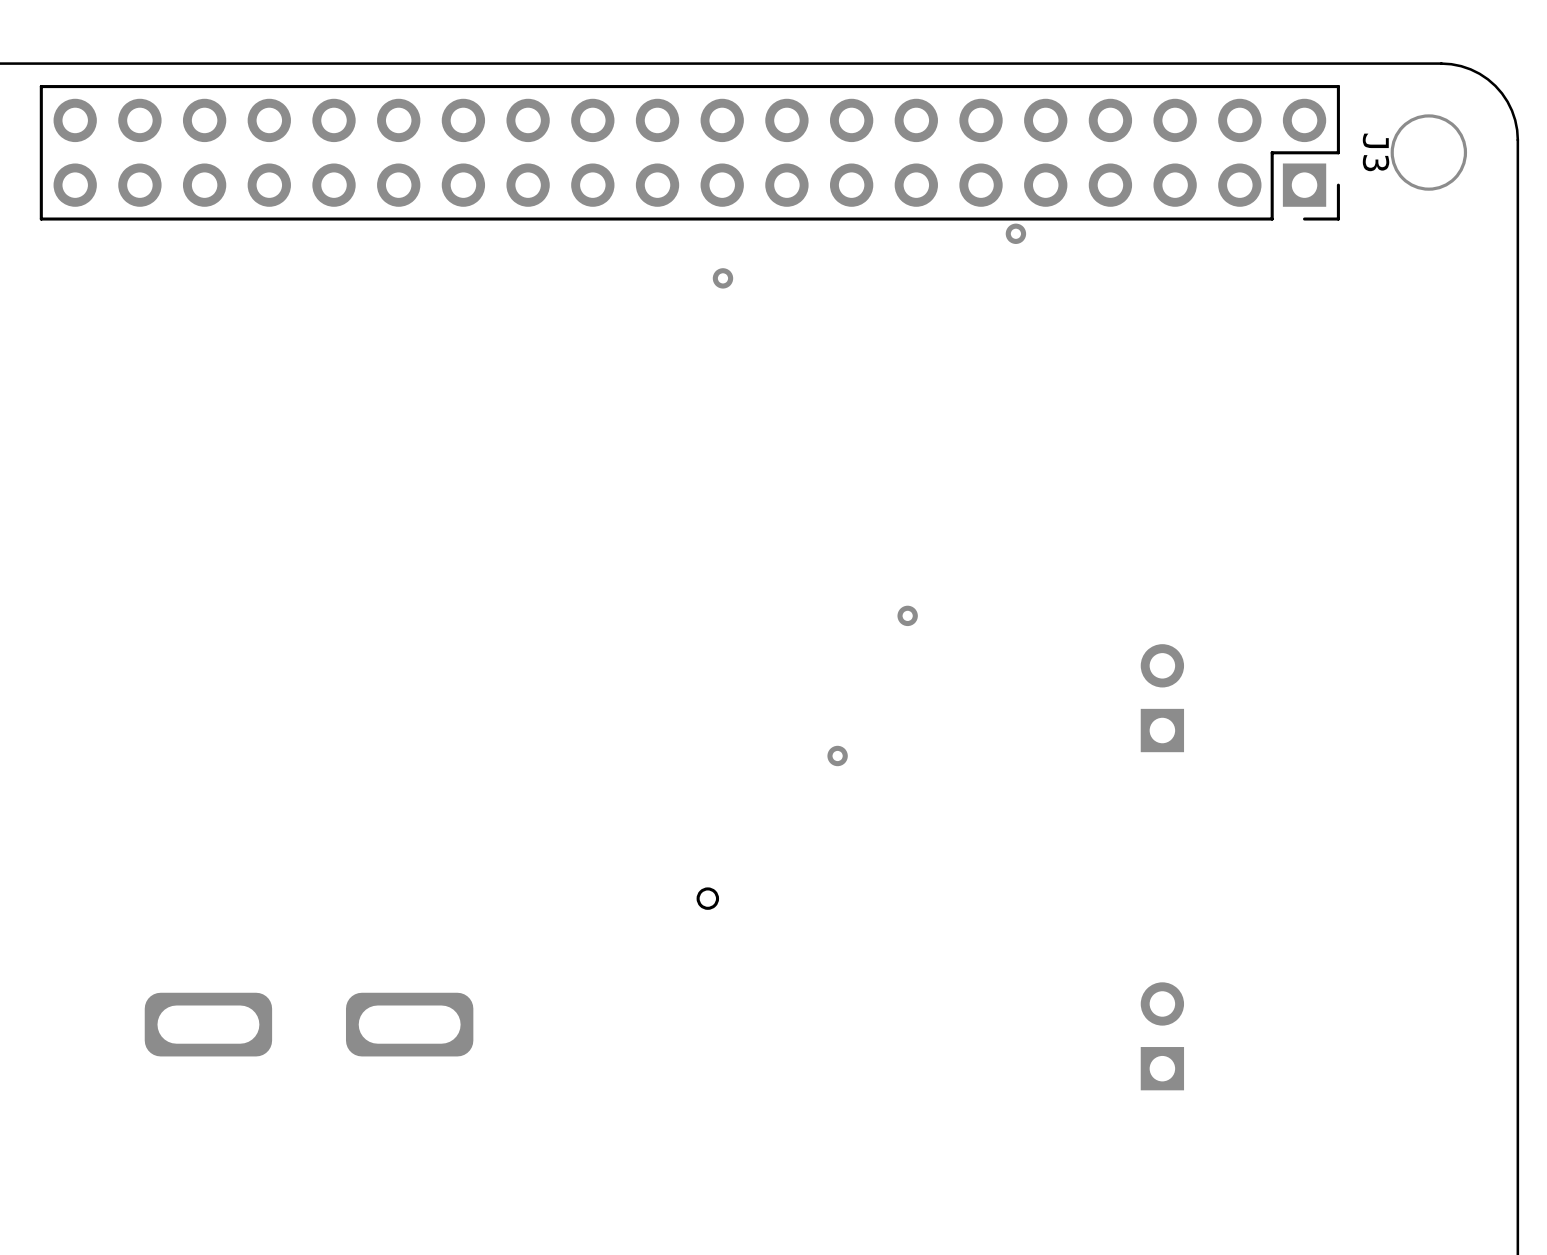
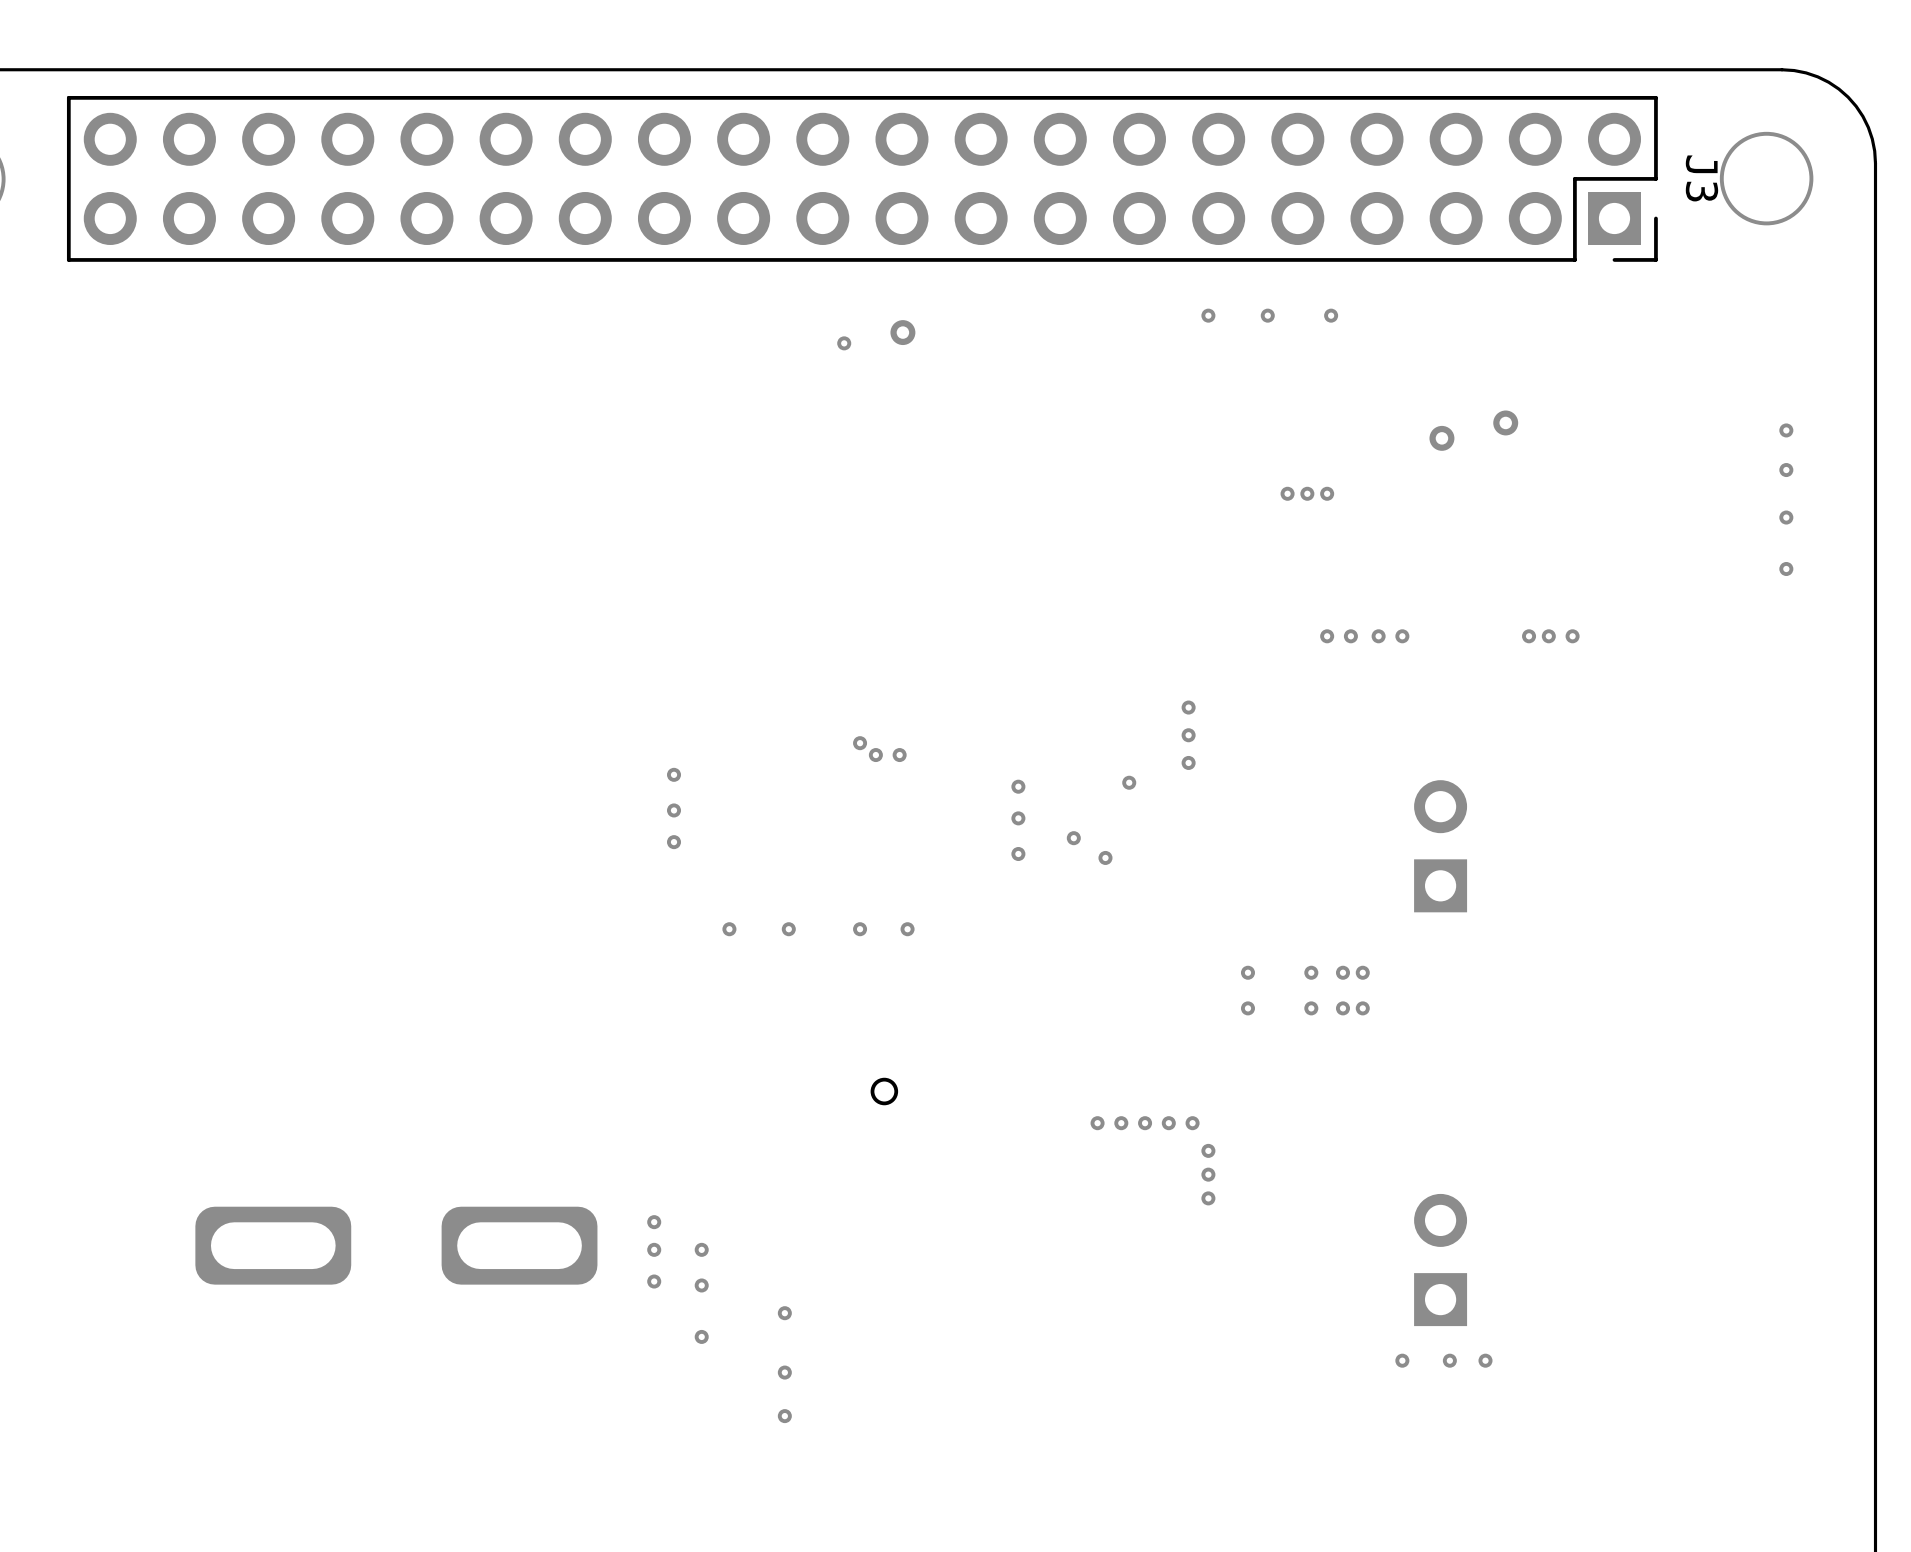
via: (1015, 233) -> none
via: none -> (1208, 315)
via: none -> (1267, 315)
via: none -> (1331, 315)
via: none -> (844, 343)
via: none -> (1505, 422)
via: none -> (1786, 430)
via: none -> (1441, 438)
via: none -> (1786, 470)
via: none -> (1287, 493)
via: none -> (1307, 493)
via: none -> (1327, 493)
via: none -> (1786, 517)
via: none -> (1786, 568)
via: none -> (1327, 636)
via: none -> (1350, 636)
via: none -> (1378, 636)
via: none -> (1402, 636)
via: none -> (1529, 636)
via: none -> (1548, 636)
via: none -> (1572, 636)
via: none -> (1188, 707)
via: none -> (1188, 735)
via: none -> (860, 743)
via: (907, 615) -> none
via: none -> (875, 755)
via: none -> (899, 755)
via: none -> (1188, 762)
via: none -> (674, 774)
via: none -> (1129, 782)
via: none -> (1018, 786)
via: none -> (674, 810)
via: none -> (1018, 818)
via: none -> (1073, 838)
via: none -> (674, 842)
via: none -> (1018, 854)
via: none -> (1105, 857)
via: (837, 755) -> none
via: none -> (729, 929)
via: none -> (788, 929)
via: none -> (860, 929)
via: none -> (907, 929)
via: none -> (1247, 972)
via: none -> (1311, 972)
via: none -> (1342, 972)
via: none -> (1362, 972)
via: none -> (1247, 1008)
via: none -> (1311, 1008)
via: none -> (1342, 1008)
via: none -> (1362, 1008)
via: none -> (1097, 1123)
via: none -> (1121, 1123)
via: none -> (1145, 1123)
via: none -> (1168, 1123)
via: none -> (1192, 1123)
via: none -> (1208, 1150)
via: none -> (1208, 1174)
via: none -> (1208, 1198)
via: none -> (654, 1222)
via: none -> (654, 1249)
via: none -> (701, 1249)
via: none -> (654, 1281)
via: none -> (701, 1285)
via: none -> (784, 1313)
via: none -> (701, 1336)
via: none -> (1402, 1360)
via: none -> (1449, 1360)
via: none -> (1485, 1360)
via: none -> (784, 1372)
via: none -> (784, 1416)

